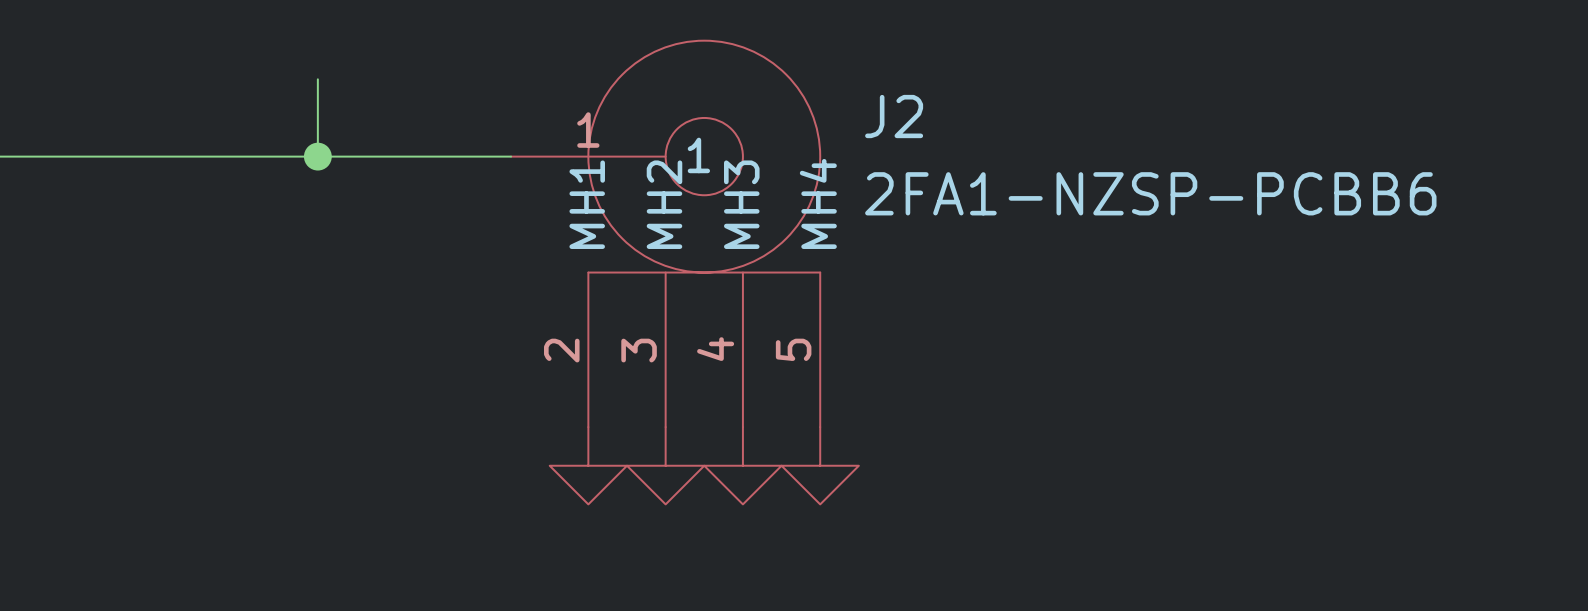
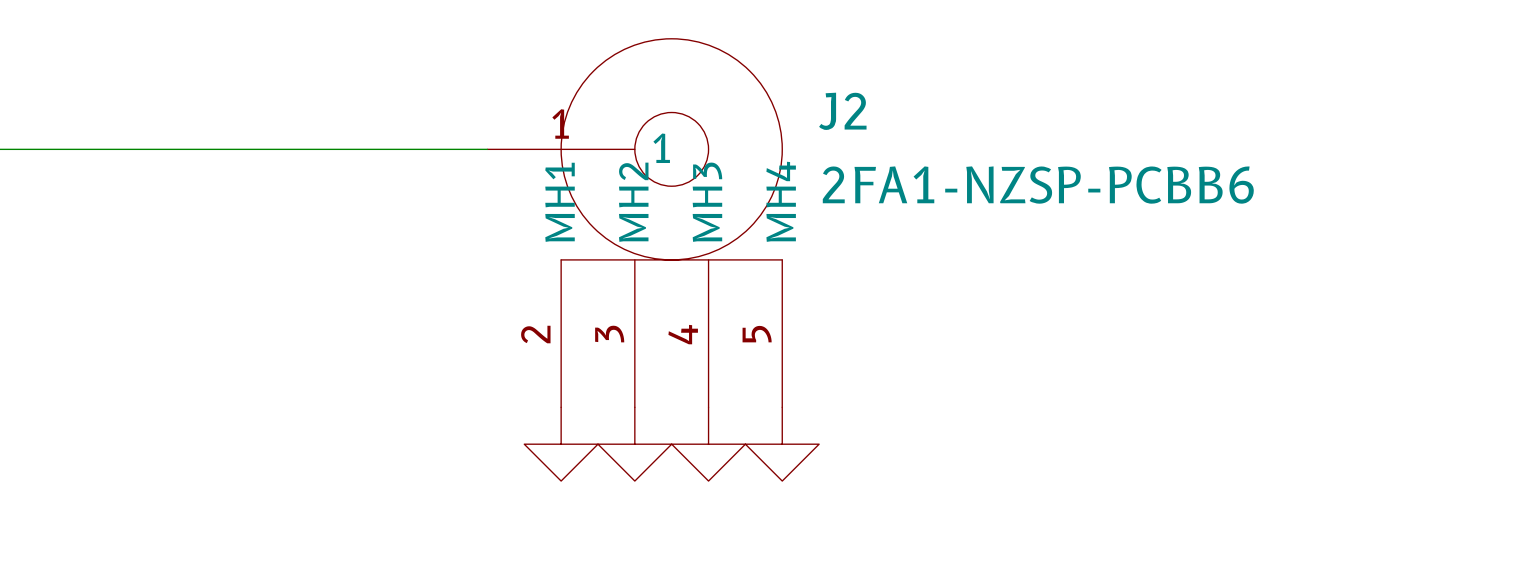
wire: (317, 79) (317, 156) -> none
junction: (317, 156) -> none

